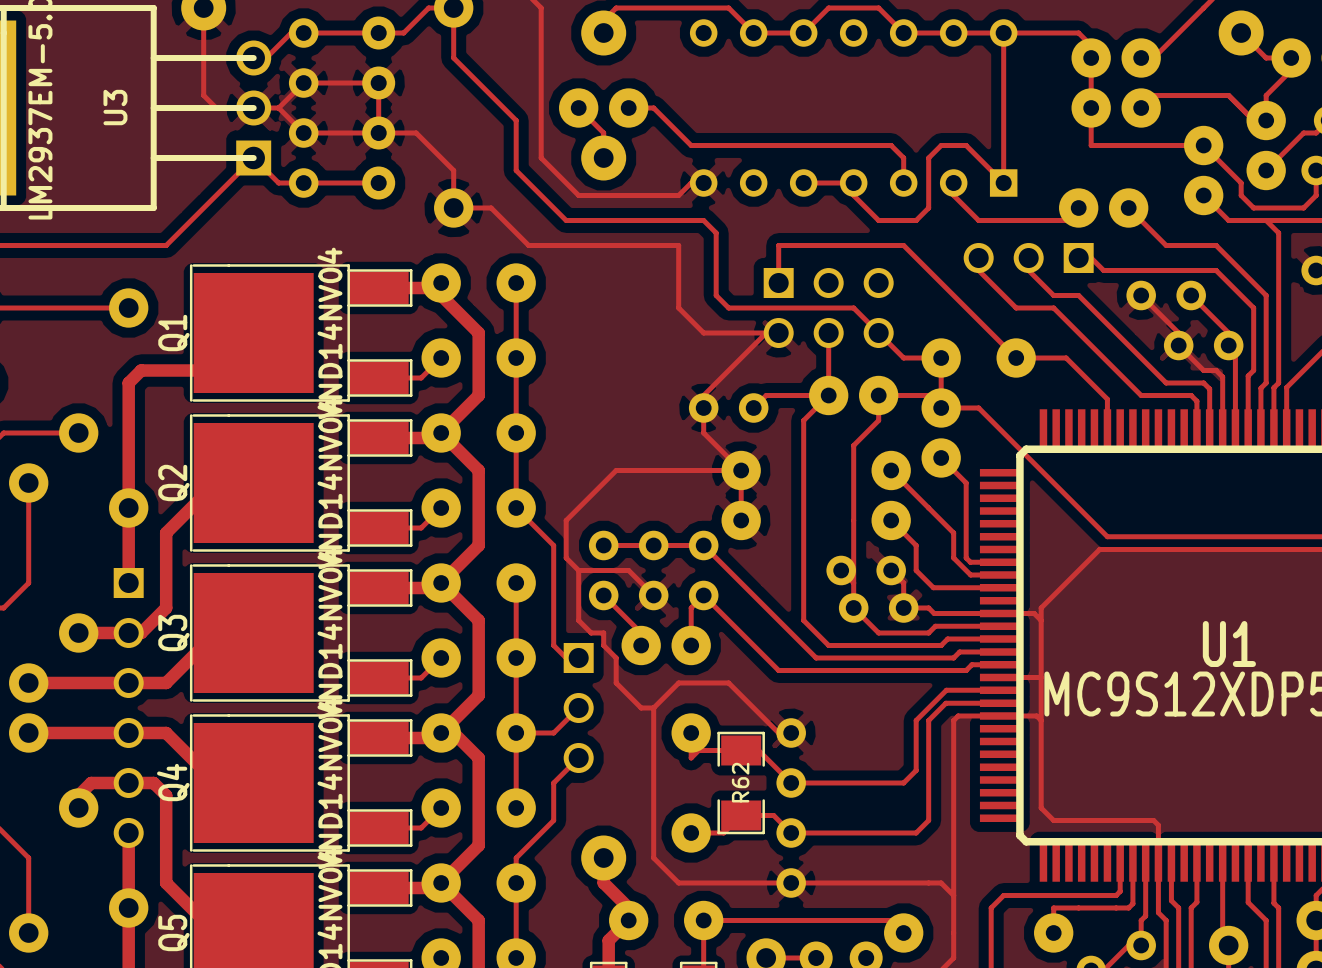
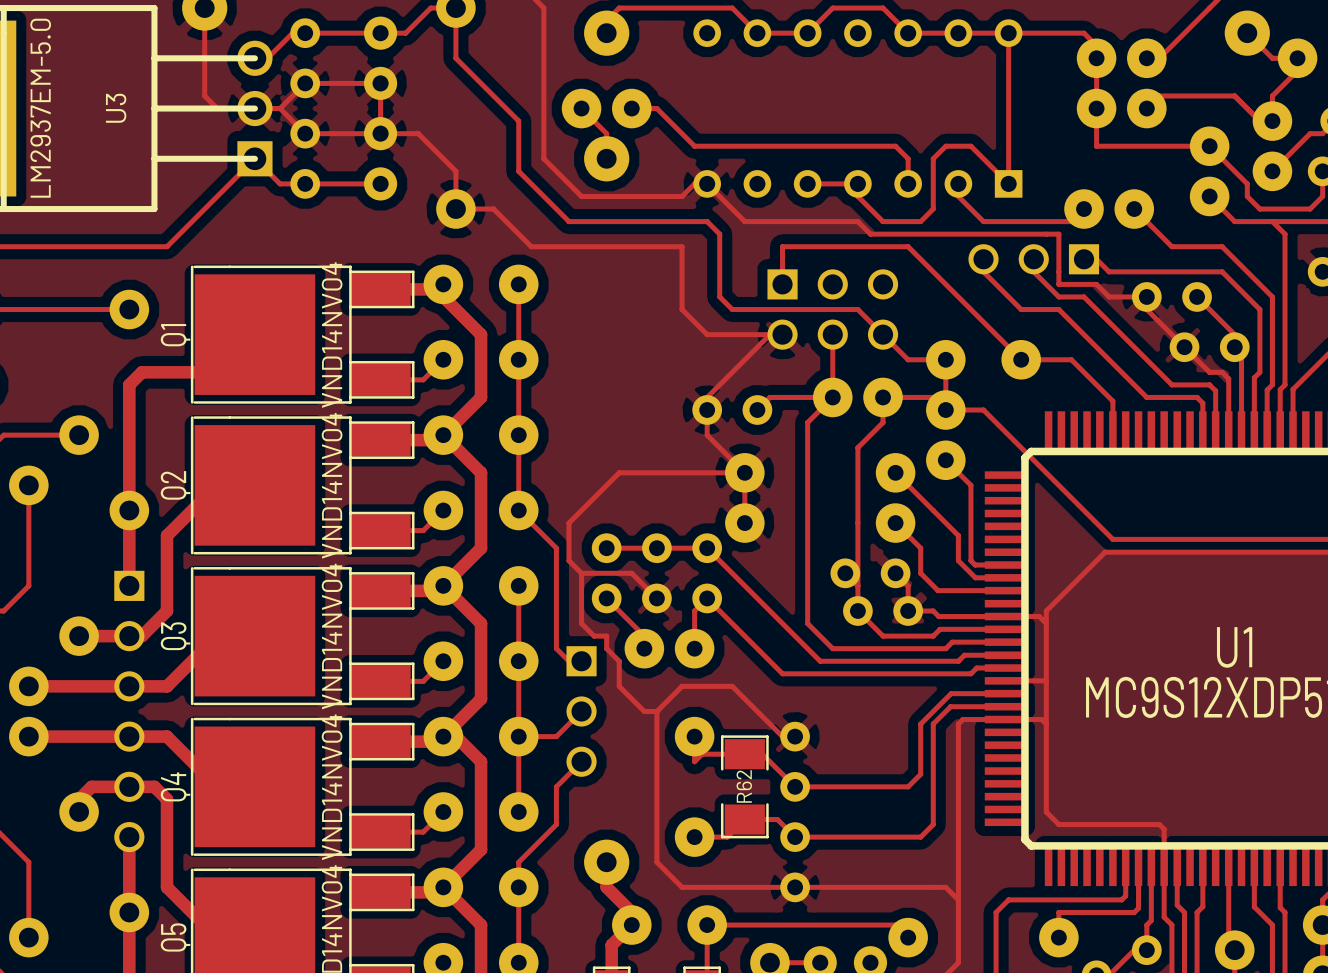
track: (1141, 295) (1178, 333) (1178, 345) -> (707, 183) (744, 221) (857, 221) (870, 234) (1058, 234) (1058, 284) (1096, 284) (1109, 296) (1146, 296) (1146, 309) (1184, 347)

